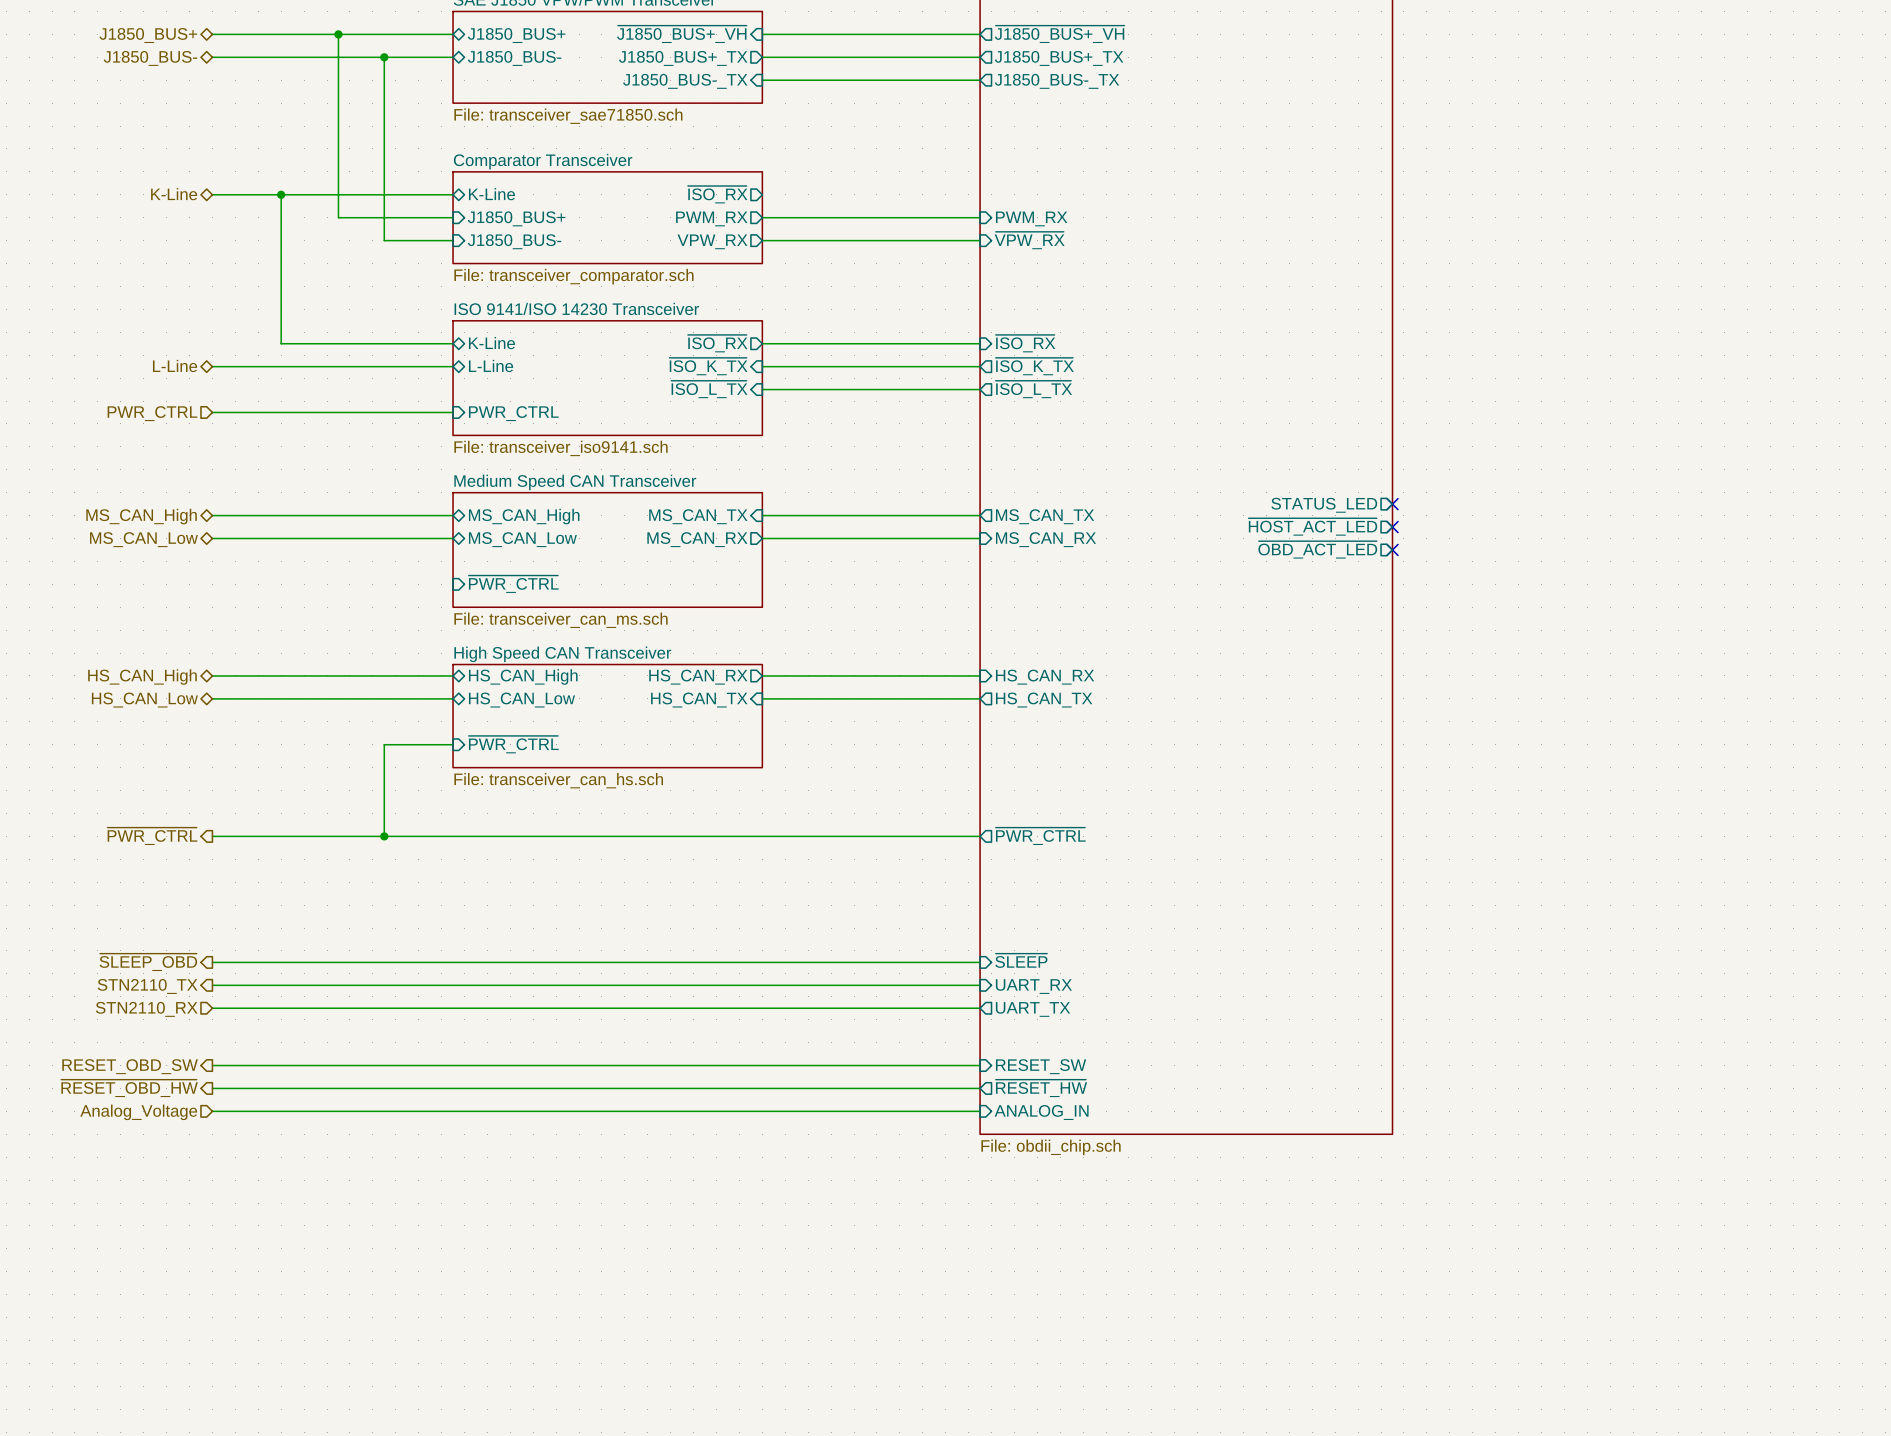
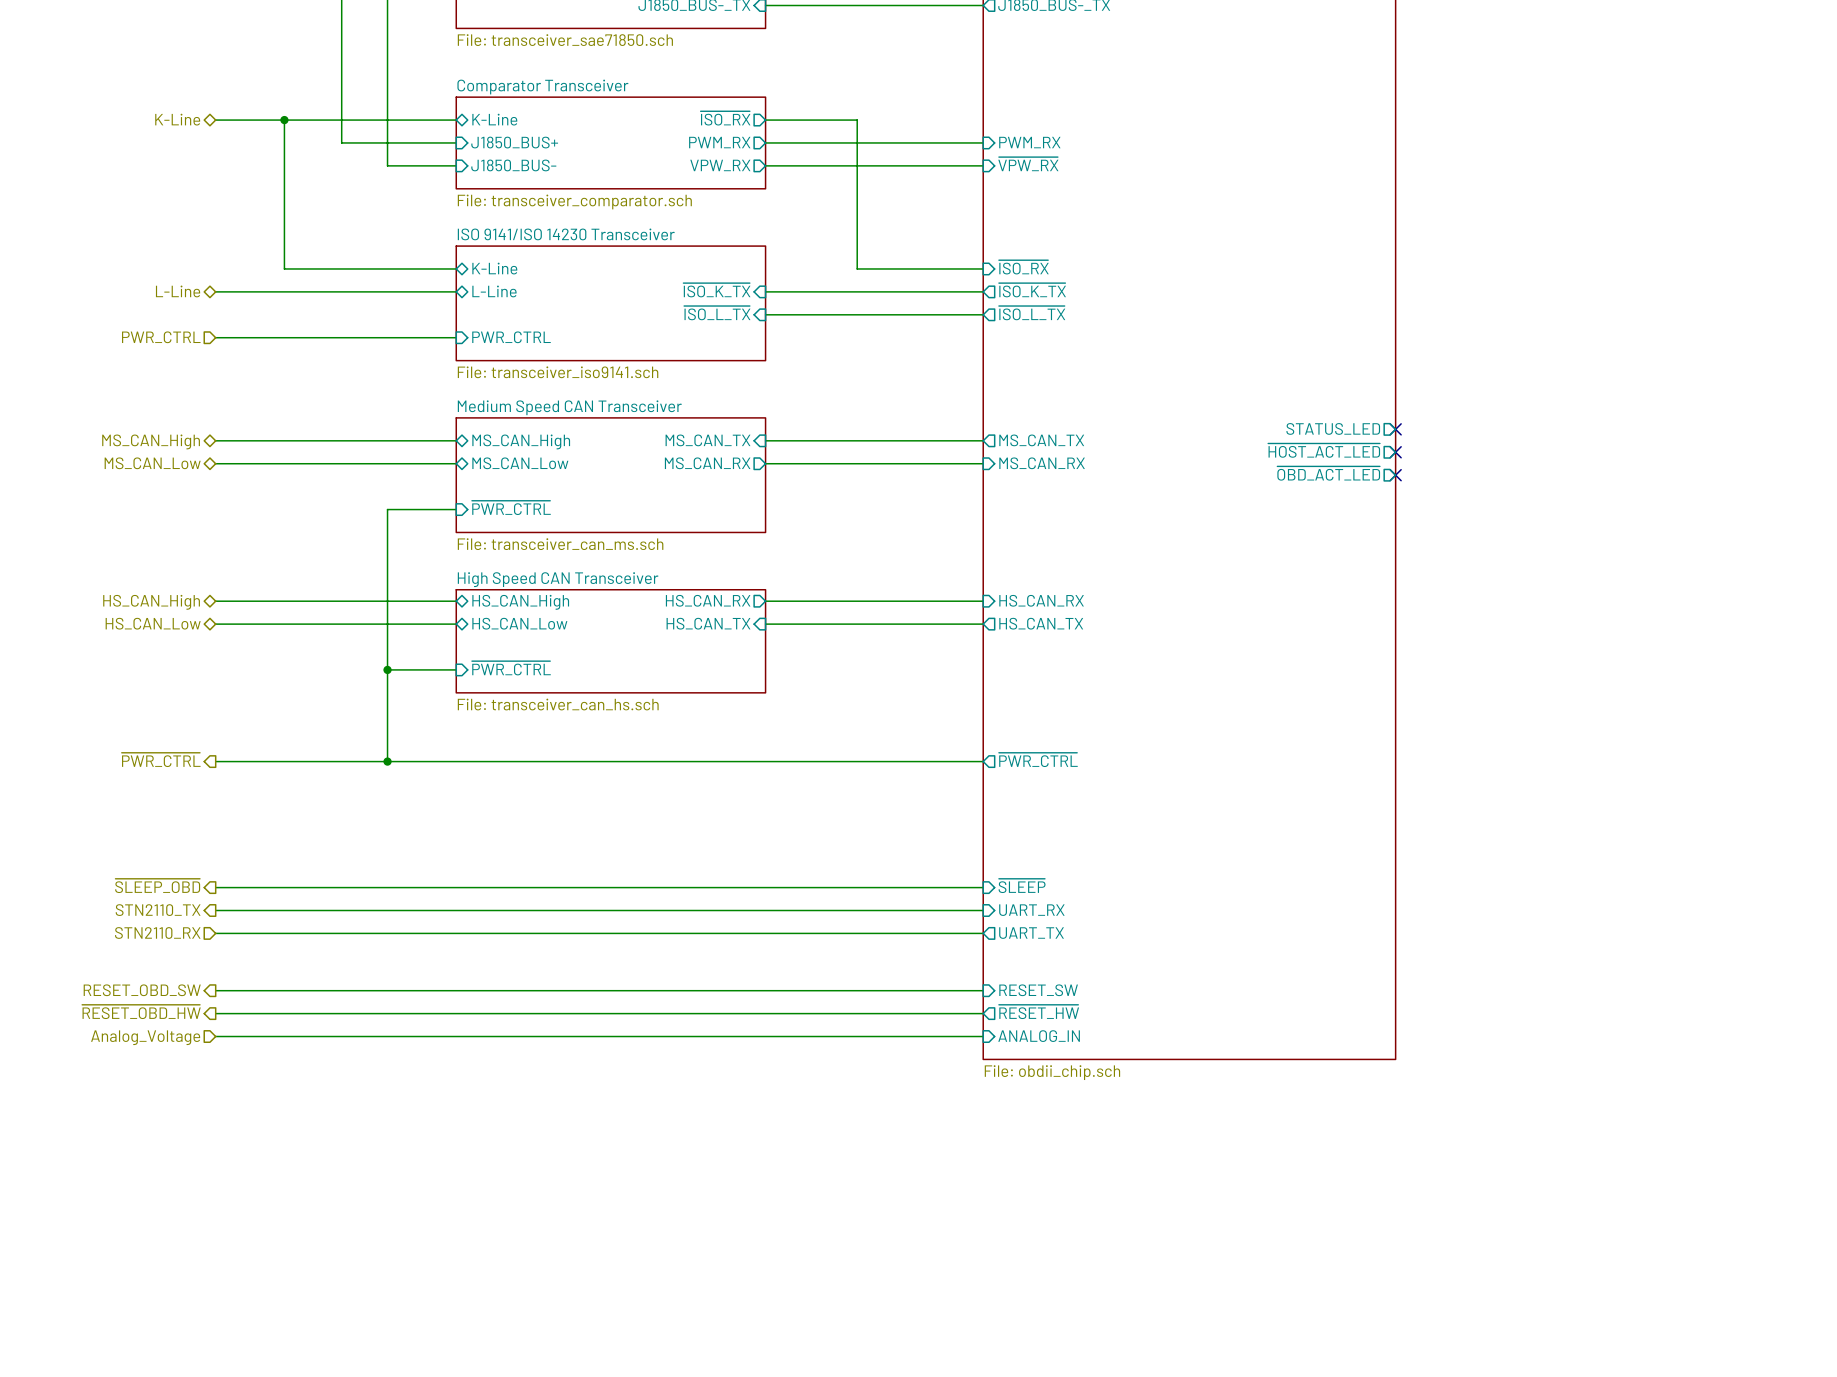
sheet pin: ~{ISO_RX} (717, 343) -> none
wire: (762, 343) (854, 343) -> (765, 120) (857, 120) (857, 268)
wire: none -> (456, 509) (387, 509) (387, 669)
junction: none -> (387, 669)

